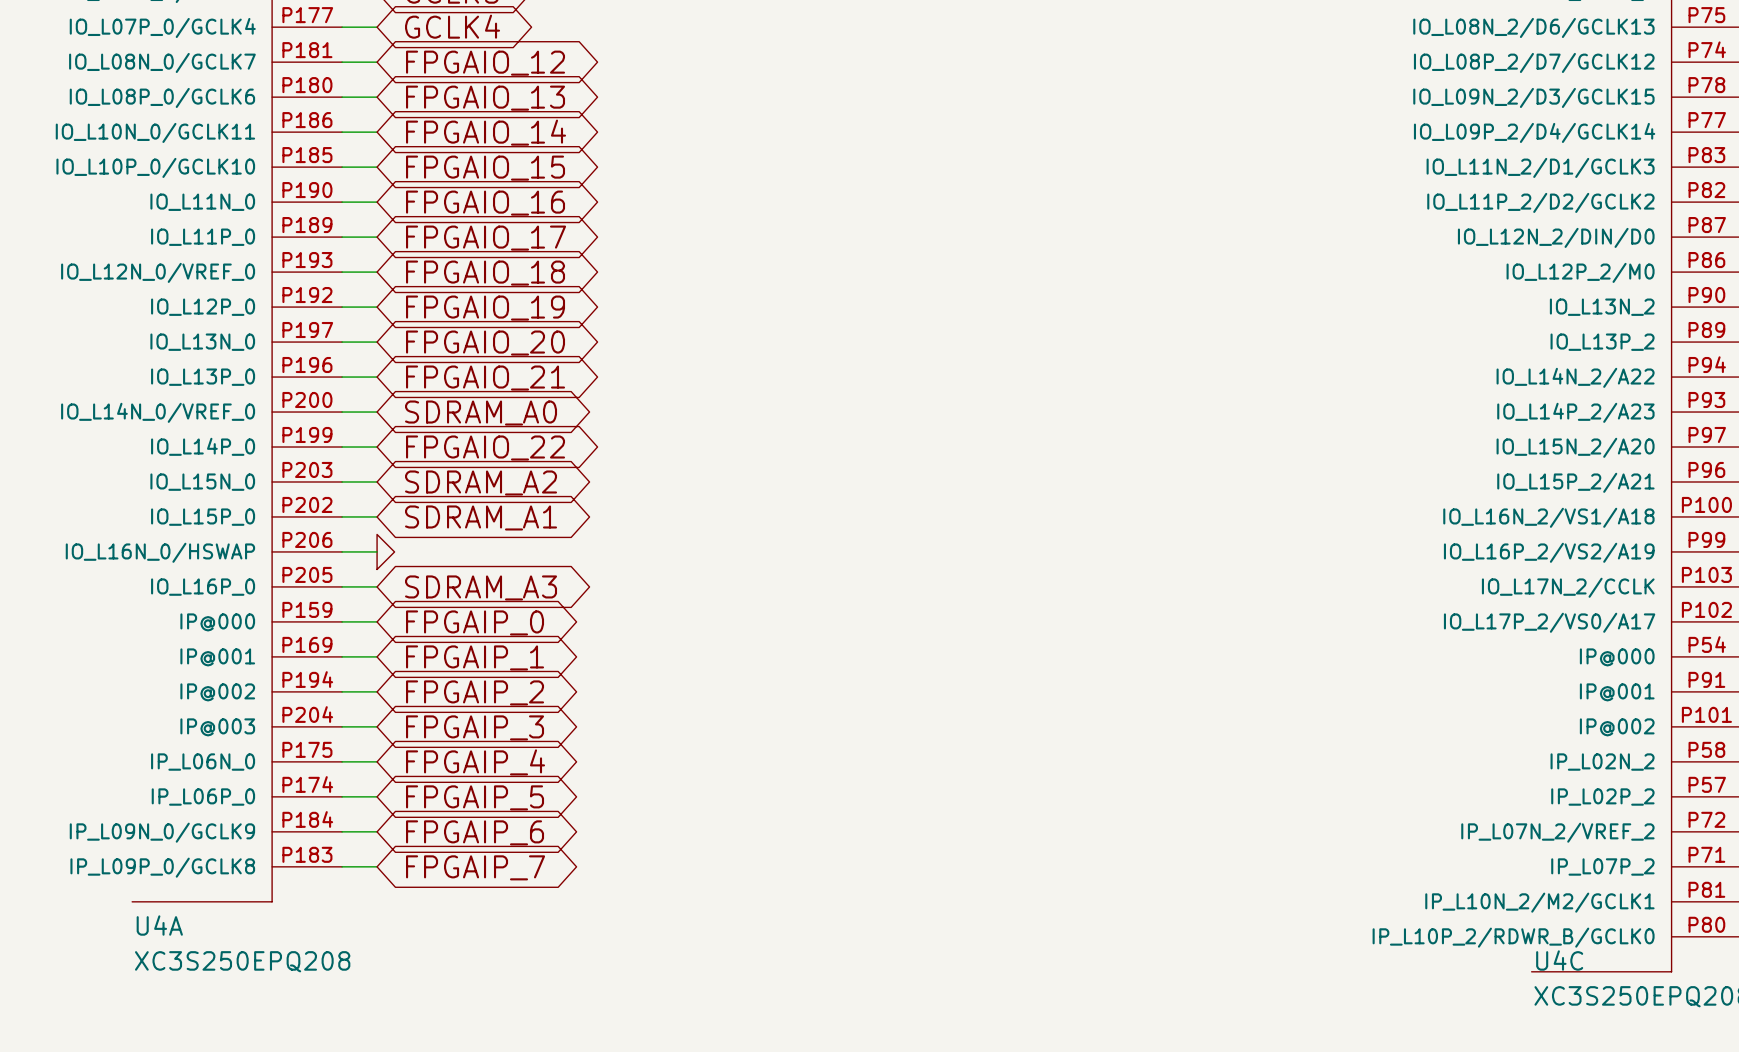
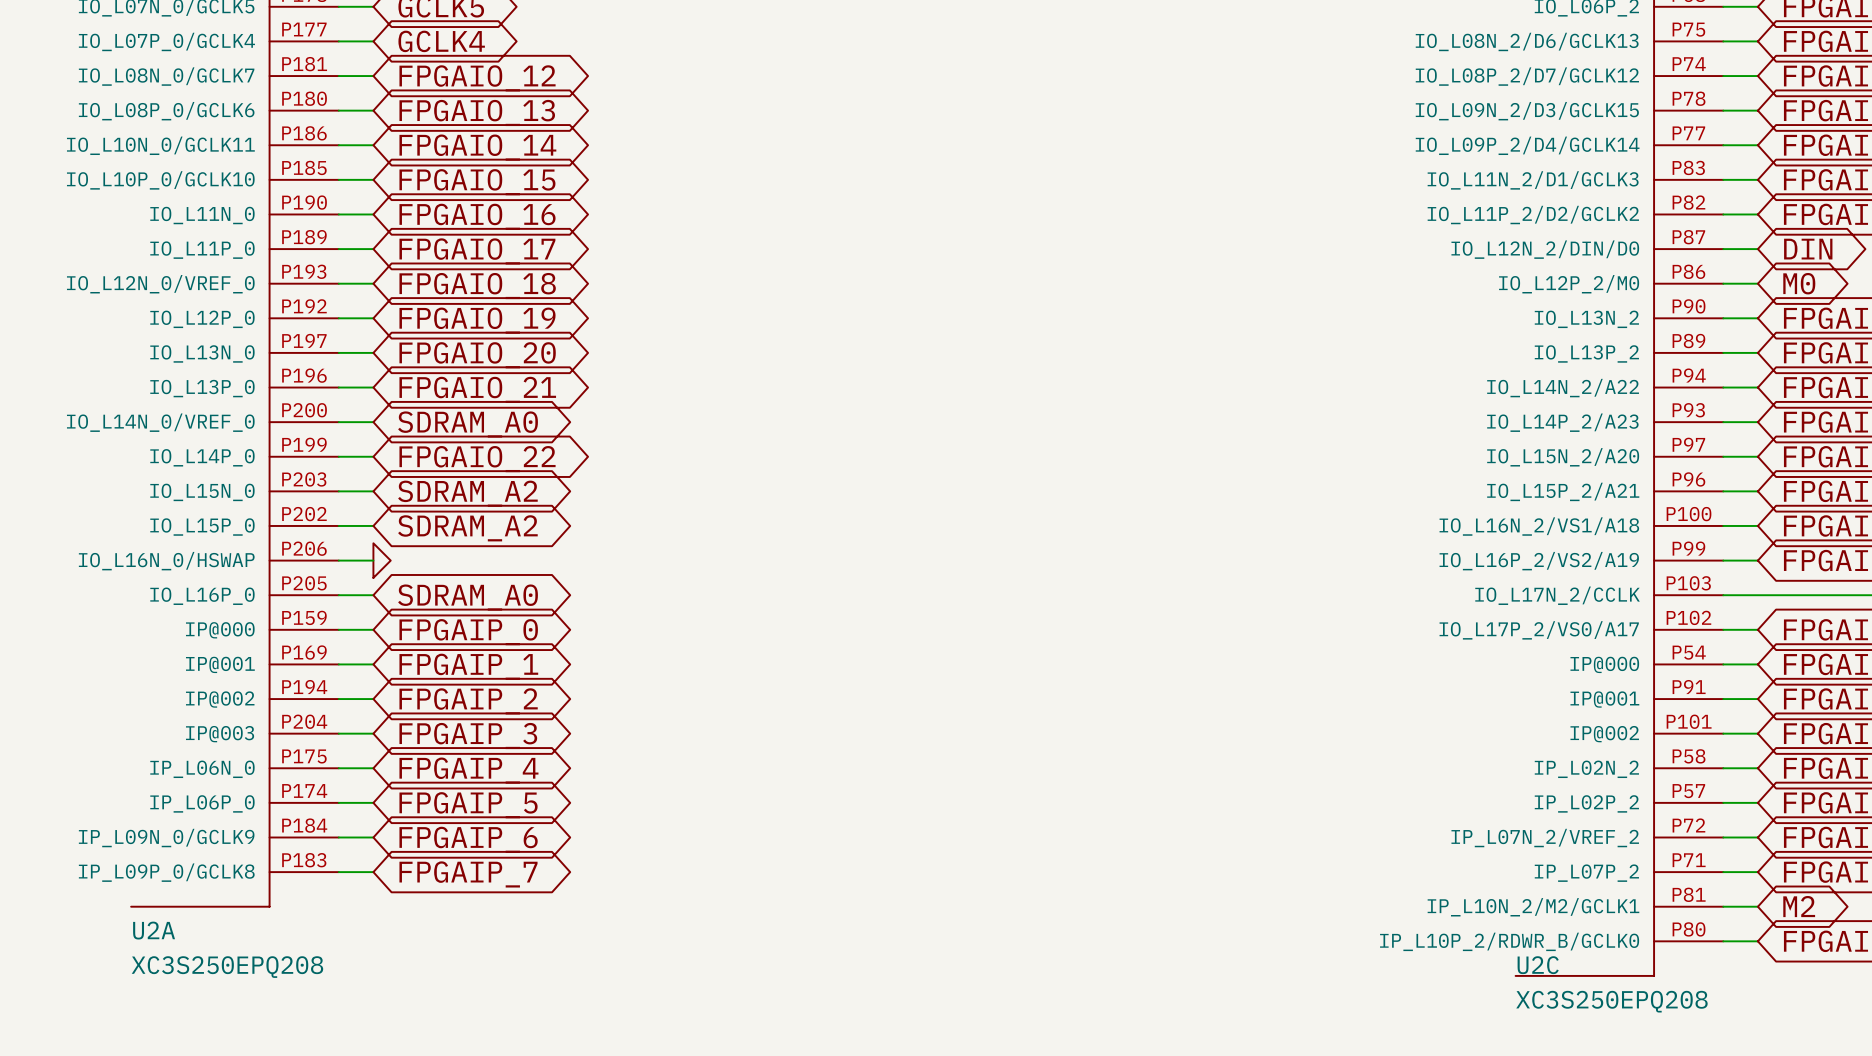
global label: SDRAM_A1 (481, 517) -> SDRAM_A2 (467, 528)
global label: SDRAM_A3 (481, 587) -> SDRAM_A0 (468, 597)
U4A name: U4A (159, 925) -> U2A (154, 930)
U4C name: U4C (1559, 960) -> U2C (1538, 965)

